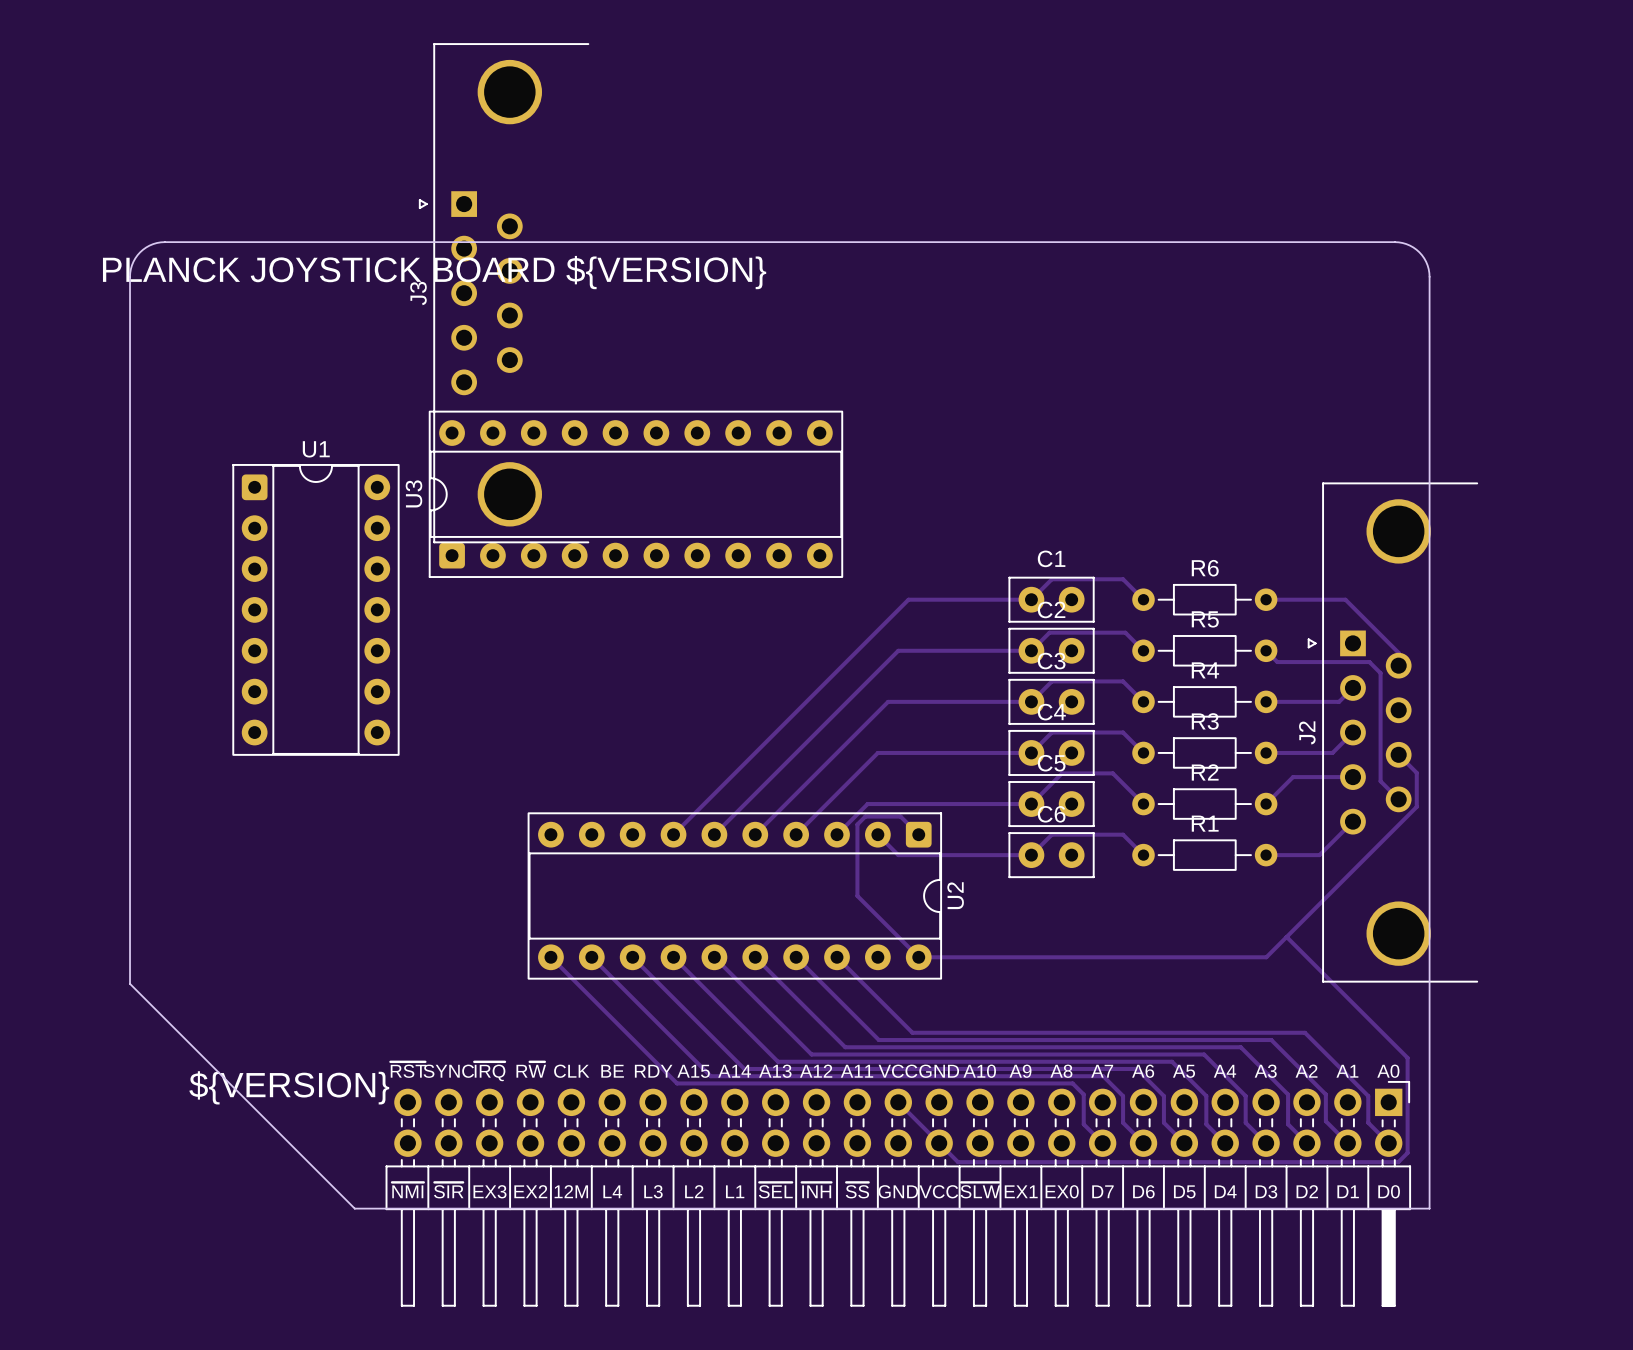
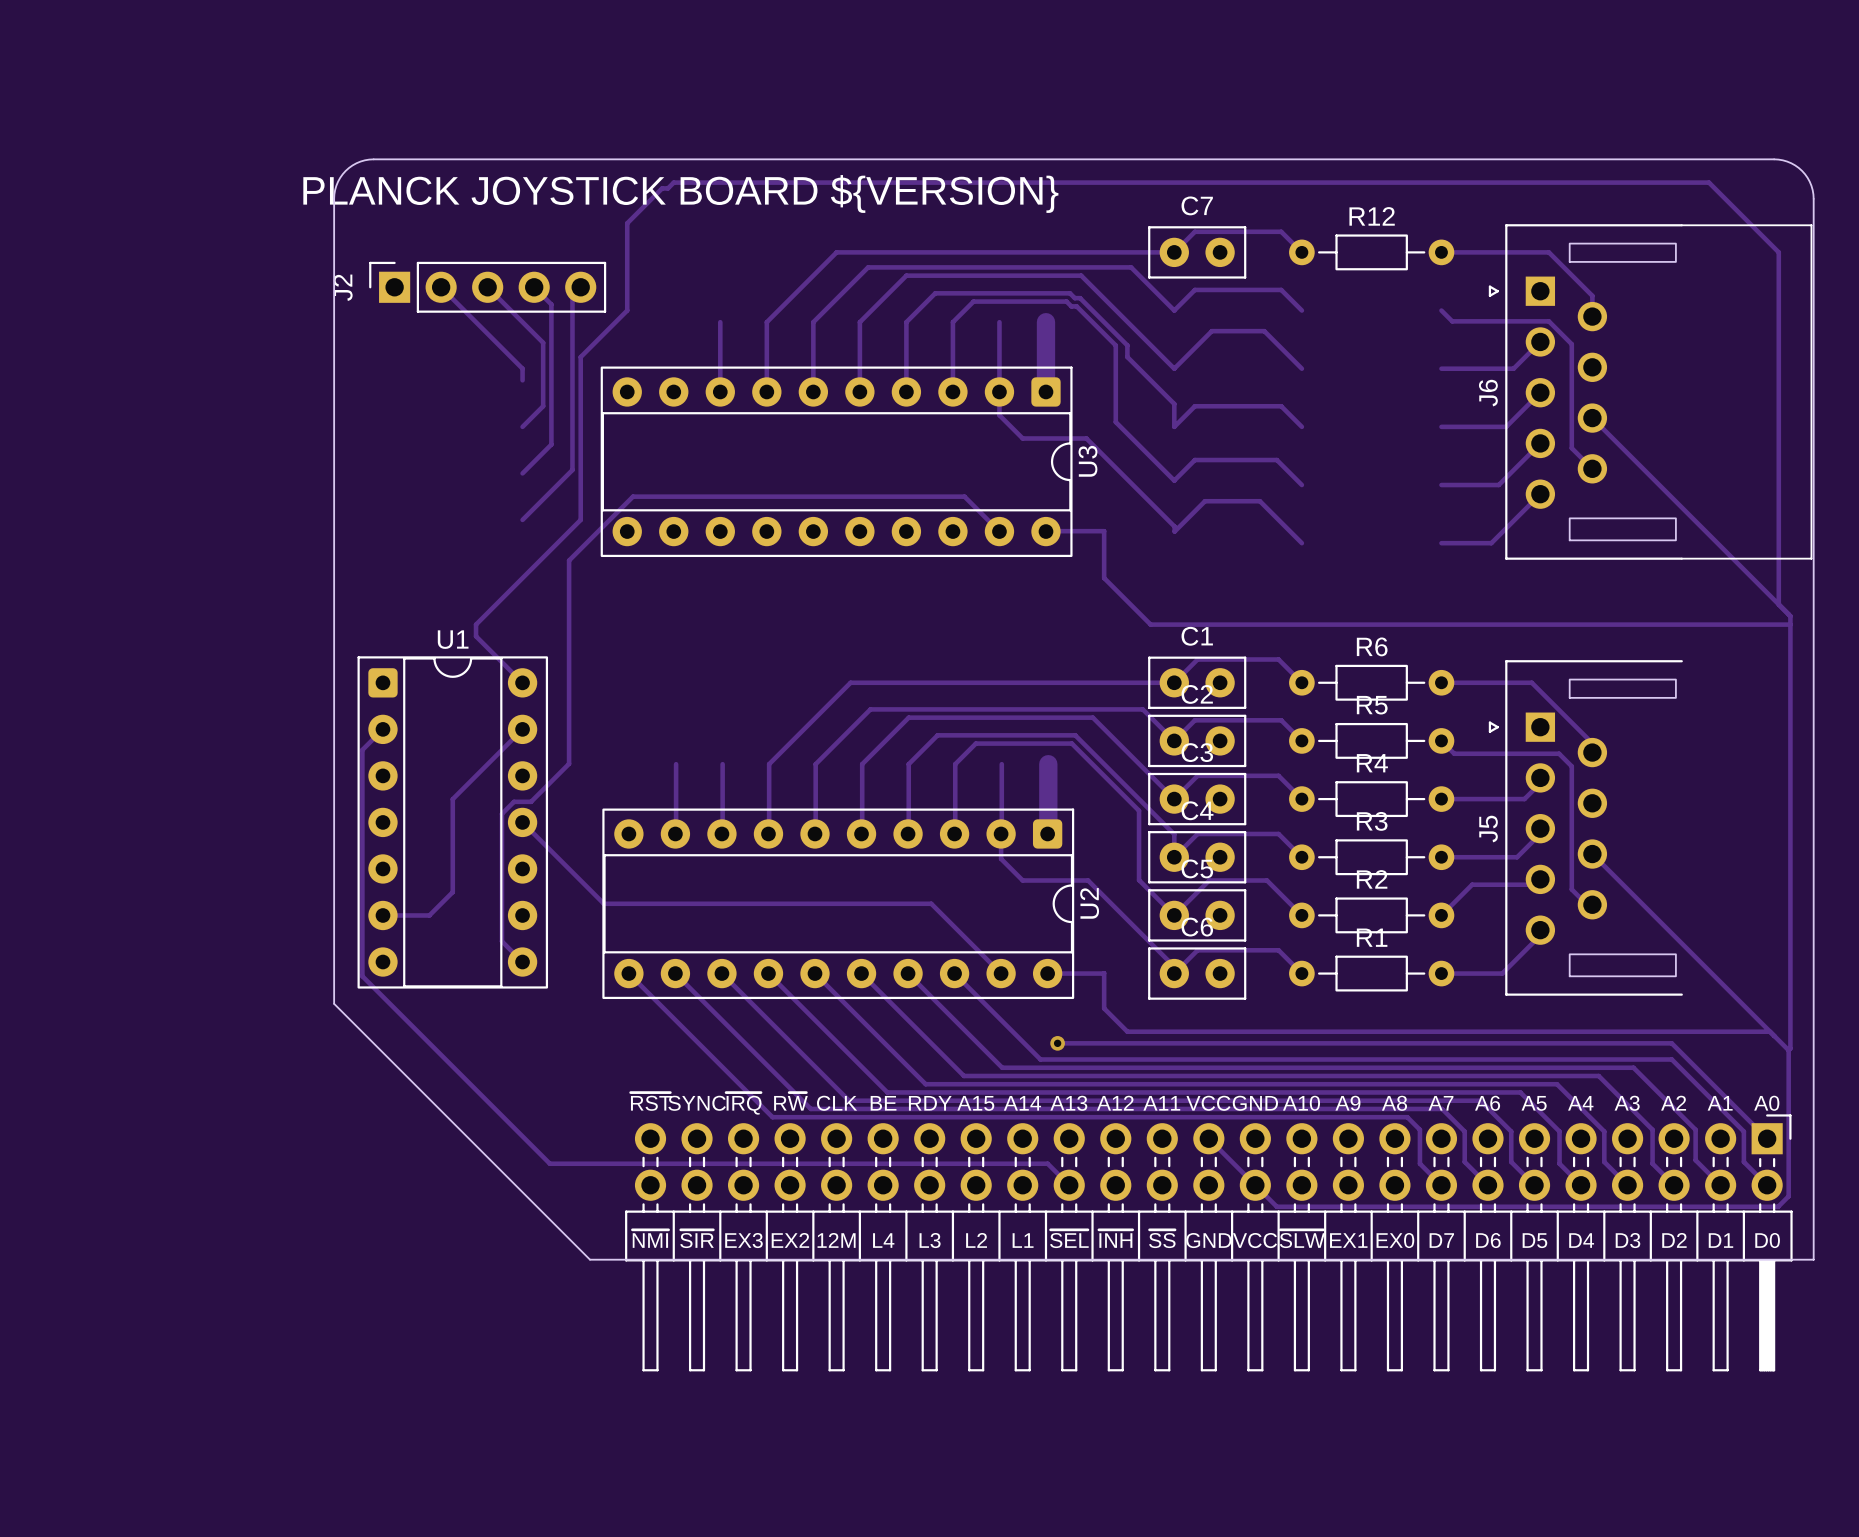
C7: none -> (1197, 252)
track: none -> (1301, 252) (1281, 231) (1194, 231) (1174, 252) (836, 252) (766, 322) (766, 391)
R12: none -> (1371, 252)
track: none -> (1441, 252) (1548, 252) (1592, 295) (1592, 316)
board edge: (164, 242) (1394, 242) (1406, 244) (1416, 249) (1426, 261) (1429, 276) (1429, 1208) (354, 1208) (130, 983) (130, 276) (131, 265) (140, 252) (149, 245) (164, 242) -> (373, 159) (1774, 159) (1787, 161) (1798, 167) (1809, 181) (1813, 198) (1813, 1259) (590, 1259) (334, 1003) (334, 198) (338, 181) (345, 170) (356, 163) (373, 159)
track: none -> (441, 287) (522, 368) (522, 380)
track: none -> (487, 287) (543, 342) (543, 406) (522, 426)
track: none -> (534, 287) (551, 304) (551, 444) (522, 473)
track: none -> (580, 287) (572, 295) (572, 470) (522, 519)
text position: PLANCK JOYSTICK BOARD ${VERSION} (434, 272) -> PLANCK JOYSTICK BOARD ${VERSION} (680, 193)
track: none -> (1301, 310) (1281, 289) (1194, 289) (1174, 310) (1131, 267) (868, 267) (813, 322) (813, 391)
track: none -> (1441, 310) (1452, 321) (1548, 321) (1571, 344) (1571, 448) (1592, 468)
track: none -> (720, 322) (720, 391)
track: none -> (999, 322) (999, 415) (1022, 438) (1086, 438) (1174, 526) (1174, 531) (1204, 501) (1259, 501) (1301, 543)
track: none -> (1045, 322) (1045, 391)
J3: (504, 293) -> none
track: none -> (1540, 341) (1513, 368) (1441, 368)
track: none -> (1301, 368) (1264, 331) (1211, 331) (1174, 368) (1081, 275) (906, 275) (859, 322) (859, 391)
track: none -> (906, 391) (906, 322) (935, 293) (1070, 293) (1074, 298) (1080, 298) (1127, 345) (1127, 357) (1174, 403) (1174, 426) (1194, 406) (1281, 406) (1301, 426)
track: none -> (952, 391) (952, 322) (973, 301) (1066, 301) (1071, 306) (1076, 306) (1115, 345) (1115, 422) (1174, 480) (1194, 460) (1276, 460) (1301, 485)
track: none -> (1540, 392) (1506, 426) (1441, 426)
J6: none -> (1650, 391)
track: none -> (1592, 418) (1788, 614)
track: none -> (1540, 443) (1498, 485) (1441, 485)
track: none -> (1540, 494) (1491, 543) (1441, 543)
track: none -> (999, 531) (964, 496) (633, 496) (569, 560) (569, 763) (531, 801) (514, 801) (501, 813) (501, 941) (522, 962) (534, 962)
track: none -> (1045, 531) (1104, 531) (1104, 578) (1150, 624) (1790, 624)
J2 footprint: [1307, 482, 1479, 983] -> [369, 261, 607, 313]
U3 rotation: 0° (635, 494) -> 180° (836, 461)
track: none -> (1788, 614) (1778, 604) (1778, 252) (1708, 182) (673, 182) (667, 188) (662, 188) (627, 223) (627, 310) (580, 357) (580, 519) (476, 624) (476, 636) (522, 682)
track: none -> (1788, 614) (1790, 616) (1790, 1048) (1788, 1050)
track: (908, 599) (673, 834) -> (1034, 682) (850, 682) (769, 764) (768, 833)
U1 position: (315, 609) -> (452, 822)
track: none -> (382, 729) (362, 749) (362, 976) (549, 1163) (1047, 1163) (1069, 1185)
track: none -> (522, 729) (452, 799) (452, 892) (429, 915) (382, 915)
track: (1031, 650) (898, 650) (714, 834) -> (1174, 740) (1142, 709) (870, 709) (815, 764) (815, 833)
track: none -> (676, 764) (675, 833)
track: none -> (722, 764) (721, 833)
track: none -> (1048, 764) (1047, 833)
track: (1031, 701) (888, 701) (755, 834) -> (1174, 799) (1092, 717) (908, 717) (862, 764) (861, 833)
track: none -> (522, 822) (603, 903) (931, 903) (1001, 973)
J5: none -> (1585, 827)
J2 name position: J2 (1307, 732) -> J2 (343, 287)
track: none -> (1592, 854) (1774, 1036)
track: (1031, 752) (877, 752) (796, 834) -> (1174, 857) (1174, 834) (1075, 735) (937, 735) (908, 764) (908, 833)
track: (1398, 754) (1416, 772) (1416, 806) (1266, 957) (918, 957) (857, 895) (857, 824) (865, 816) (900, 816) (918, 834) -> none
track: (1031, 804) (867, 804) (837, 834) -> (1174, 915) (1139, 880) (1139, 810) (1071, 743) (975, 743) (955, 764) (954, 833)
track: (877, 834) (898, 855) (920, 855) -> none
track: none -> (628, 973) (772, 1117) (1407, 1117) (1419, 1129) (1419, 1163) (1441, 1185)
track: none -> (675, 973) (810, 1108) (1442, 1108) (1464, 1131) (1464, 1161) (1487, 1185)
track: none -> (716, 973) (721, 973) (849, 1100) (1480, 1100) (1511, 1131) (1511, 1161) (1534, 1185)
track: none -> (768, 973) (887, 1092) (1520, 1092) (1559, 1131) (1559, 1163) (1581, 1185)
track: none -> (815, 973) (925, 1084) (1556, 1084) (1604, 1131) (1604, 1161) (1627, 1185)
track: none -> (861, 973) (963, 1075) (1598, 1075) (1652, 1129) (1652, 1163) (1674, 1185)
track: none -> (908, 973) (1002, 1067) (1633, 1067) (1695, 1129) (1695, 1160) (1720, 1185)
track: none -> (954, 973) (1040, 1059) (1671, 1059) (1743, 1131) (1743, 1161) (1767, 1185)
track: (969, 855) (1031, 855) -> (1001, 764) (1001, 858) (1022, 880) (1088, 880) (1174, 966) (1174, 973)
track: none -> (1103, 973) (1104, 1008) (1127, 1031) (1770, 1031) (1774, 1036)
U2 position: (734, 895) -> (838, 903)
track: none -> (1774, 1036) (1788, 1050)
track: none -> (1057, 1043) (1671, 1043) (1767, 1138)
via: none -> (1057, 1043)
track: none -> (1788, 1050) (1788, 1196) (1778, 1206) (1276, 1206) (1208, 1138)
track: (1286, 936) (1407, 1057) (1407, 1152) (1398, 1162) (958, 1162) (898, 1102) -> none
track: (550, 957) (677, 1083) (1072, 1083) (1083, 1094) (1083, 1124) (1102, 1143) -> none
track: (591, 957) (710, 1076) (1103, 1076) (1123, 1096) (1123, 1122) (1143, 1143) -> none
track: (632, 957) (744, 1068) (1136, 1068) (1163, 1096) (1163, 1122) (1184, 1143) -> none
track: (673, 957) (777, 1061) (1172, 1061) (1206, 1096) (1206, 1124) (1225, 1143) -> none
track: (714, 957) (811, 1054) (1204, 1054) (1245, 1096) (1245, 1122) (1266, 1143) -> none
track: (755, 957) (845, 1047) (1240, 1047) (1288, 1094) (1288, 1124) (1306, 1143) -> none
track: (796, 957) (878, 1040) (1271, 1040) (1325, 1094) (1325, 1121) (1347, 1143) -> none
track: (837, 957) (912, 1032) (1304, 1032) (1368, 1096) (1368, 1122) (1388, 1143) -> none
text: none -> VCC (1208, 1103)
text: none -> GND (1255, 1103)
text position: ~{RST} (408, 1069) -> ~{RST} (651, 1101)
text position: R~{W} (531, 1069) -> R~{W} (790, 1101)
text position: SYNC (448, 1071) -> SYNC (697, 1103)
text position: ~{IRQ} (489, 1071) -> ~{IRQ} (743, 1103)
text position: CLK (571, 1071) -> CLK (837, 1103)
text position: BE (612, 1071) -> BE (883, 1103)
text position: RDY (653, 1071) -> RDY (930, 1103)
text position: A15 (693, 1071) -> A15 (975, 1103)
text position: A14 (734, 1071) -> A14 (1022, 1103)
text position: A13 (775, 1071) -> A13 (1068, 1103)
text position: A12 (816, 1071) -> A12 (1115, 1103)
text position: A11 (857, 1071) -> A11 (1161, 1103)
text: VCC (897, 1071) -> none
text: GND (939, 1071) -> none
text position: A10 (979, 1071) -> A10 (1301, 1103)
text position: A9 (1020, 1071) -> A9 (1347, 1103)
text position: A8 (1061, 1071) -> A8 (1394, 1103)
text position: A7 (1102, 1071) -> A7 (1440, 1103)
text position: A6 (1143, 1071) -> A6 (1487, 1103)
text position: A5 (1184, 1071) -> A5 (1534, 1103)
text position: A4 (1224, 1071) -> A4 (1580, 1103)
text position: A3 (1265, 1071) -> A3 (1627, 1103)
text position: A2 (1306, 1071) -> A2 (1673, 1103)
text position: A1 (1347, 1071) -> A1 (1720, 1103)
text position: A0 (1388, 1071) -> A0 (1766, 1103)
text: ${VERSION} (289, 1087) -> none
text: none -> GND (1208, 1240)
text: none -> VCC (1255, 1240)
text position: ~{NMI} (407, 1190) -> ~{NMI} (650, 1238)
text position: ~{SIR} (448, 1190) -> ~{SIR} (697, 1238)
text position: ~{SEL} (775, 1190) -> ~{SEL} (1069, 1238)
text position: ~{INH} (816, 1190) -> ~{INH} (1115, 1238)
text position: ~{SS} (857, 1190) -> ~{SS} (1162, 1238)
text position: ~{SLW} (980, 1190) -> ~{SLW} (1302, 1238)
text position: EX3 (489, 1191) -> EX3 (743, 1240)
text position: EX2 (530, 1191) -> EX2 (790, 1240)
text position: 12M (571, 1191) -> 12M (836, 1240)
text position: L4 (612, 1191) -> L4 (883, 1240)
text position: L3 (653, 1191) -> L3 (930, 1240)
text position: L2 (694, 1191) -> L2 (976, 1240)
text position: L1 (735, 1191) -> L1 (1023, 1240)
text: GND (898, 1191) -> none
text: VCC (938, 1191) -> none
text position: EX1 (1021, 1191) -> EX1 (1348, 1240)
text position: EX0 (1062, 1191) -> EX0 (1395, 1240)
text position: D7 (1102, 1191) -> D7 (1441, 1240)
text position: D6 (1143, 1191) -> D6 (1488, 1240)
text position: D5 (1184, 1191) -> D5 (1534, 1240)
text position: D4 (1225, 1191) -> D4 (1581, 1240)
text position: D3 (1266, 1191) -> D3 (1627, 1240)
text position: D2 (1307, 1191) -> D2 (1674, 1240)
text position: D1 (1348, 1191) -> D1 (1720, 1240)
text position: D0 (1389, 1191) -> D0 (1767, 1240)
part position: (898, 1193) -> (1208, 1242)

